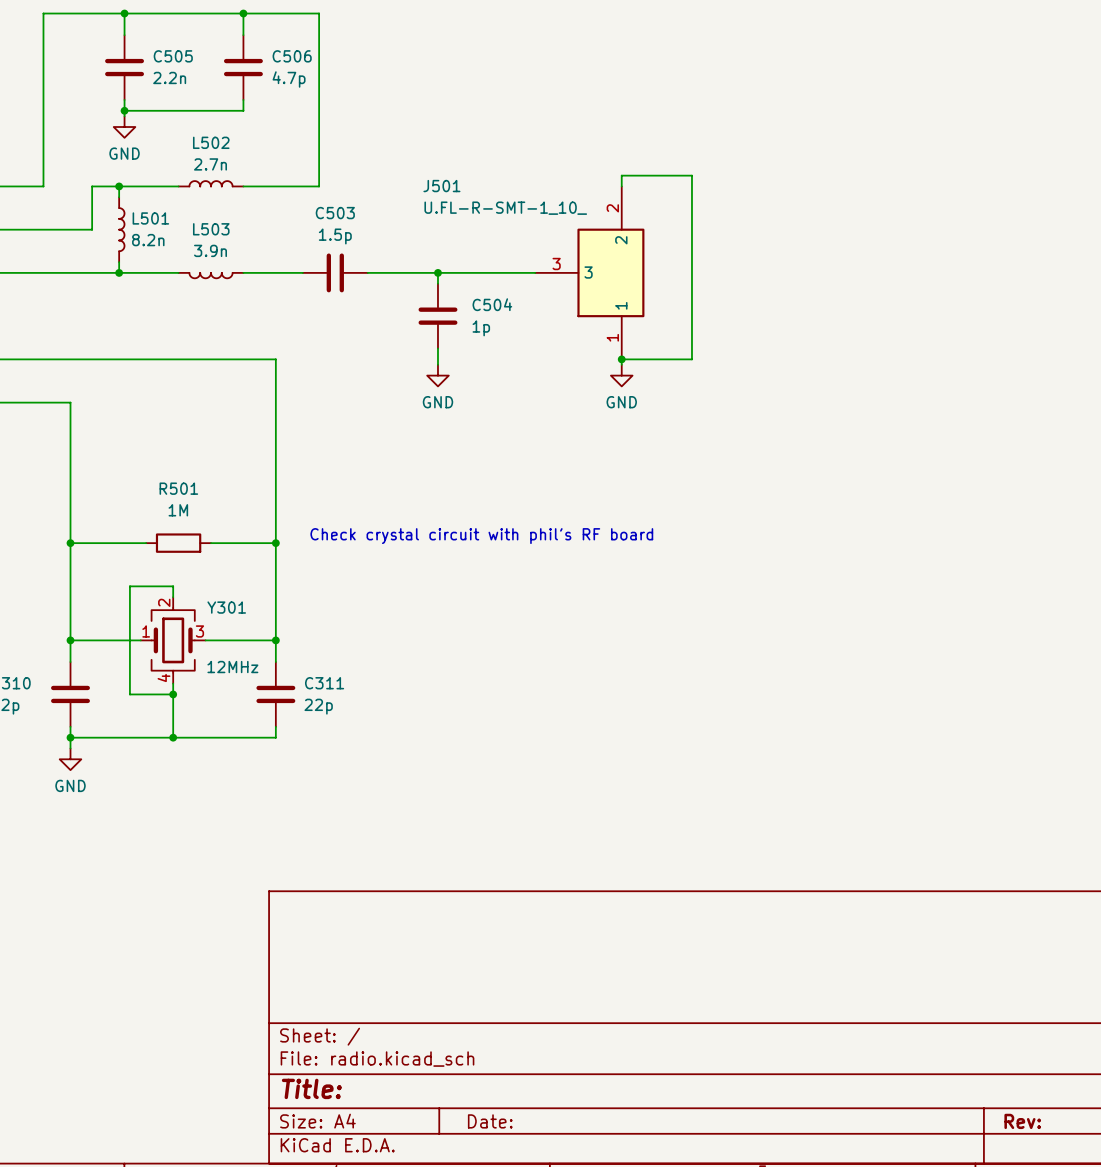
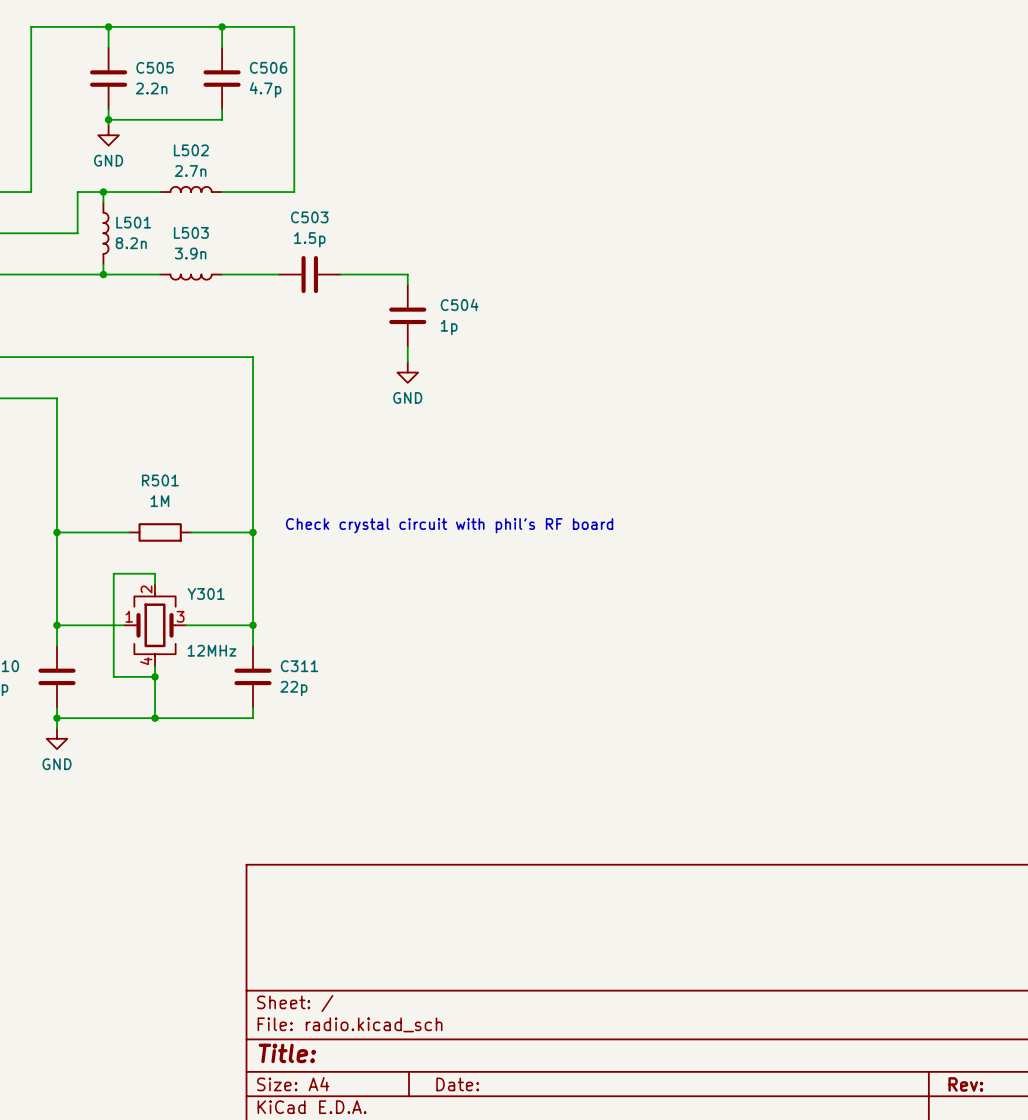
wire: (621, 186) (621, 175) (691, 175) (691, 359) (621, 359) (621, 364) -> none
wire: (437, 272) (535, 272) -> none
junction: (437, 272) -> none
J501: U.FL-R-SMT-1_10_ (589, 272) -> none
junction: (621, 359) -> none
power symbol: GND (621, 375) -> none

